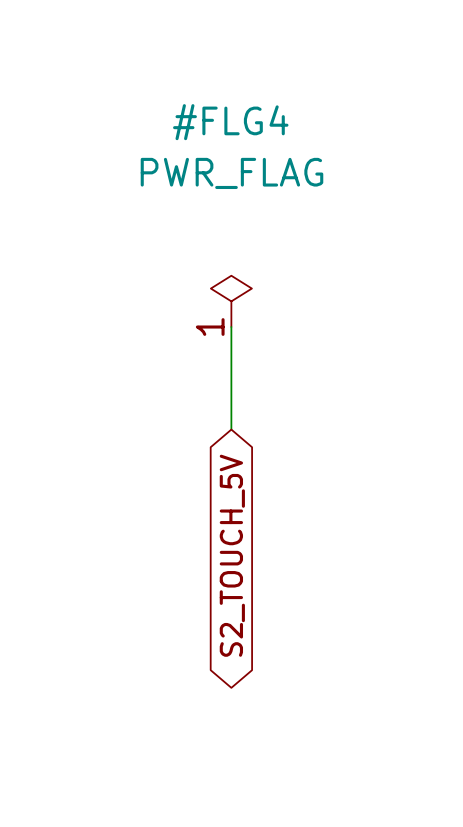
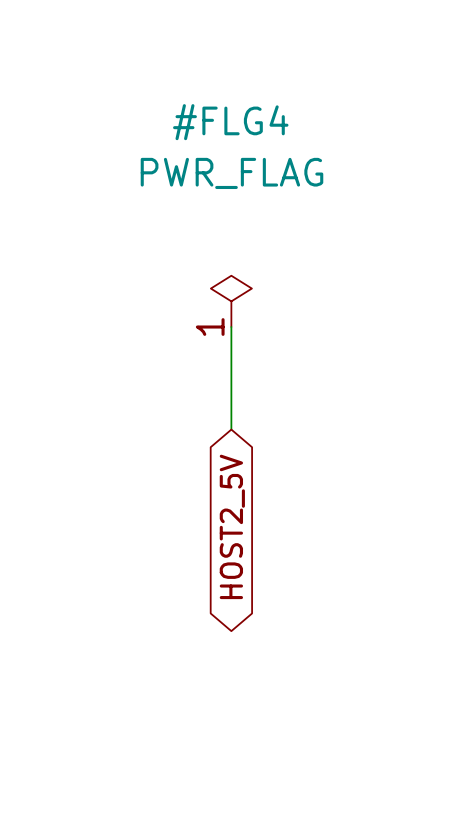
global label: S2_TOUCH_5V (232, 555) -> HOST2_5V (232, 526)

